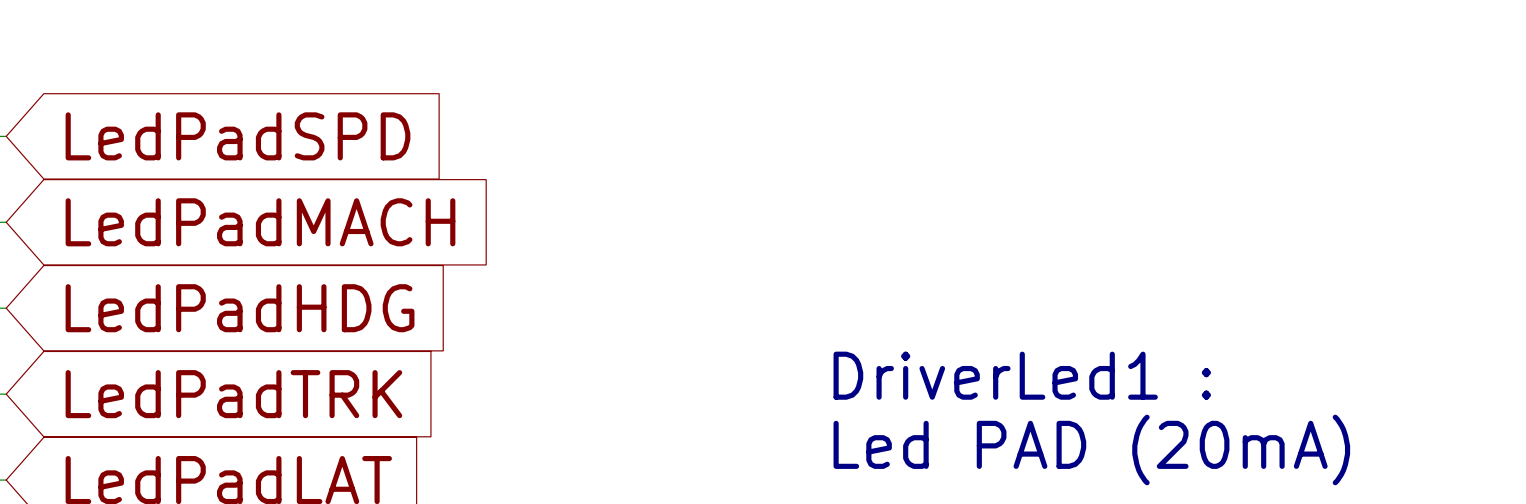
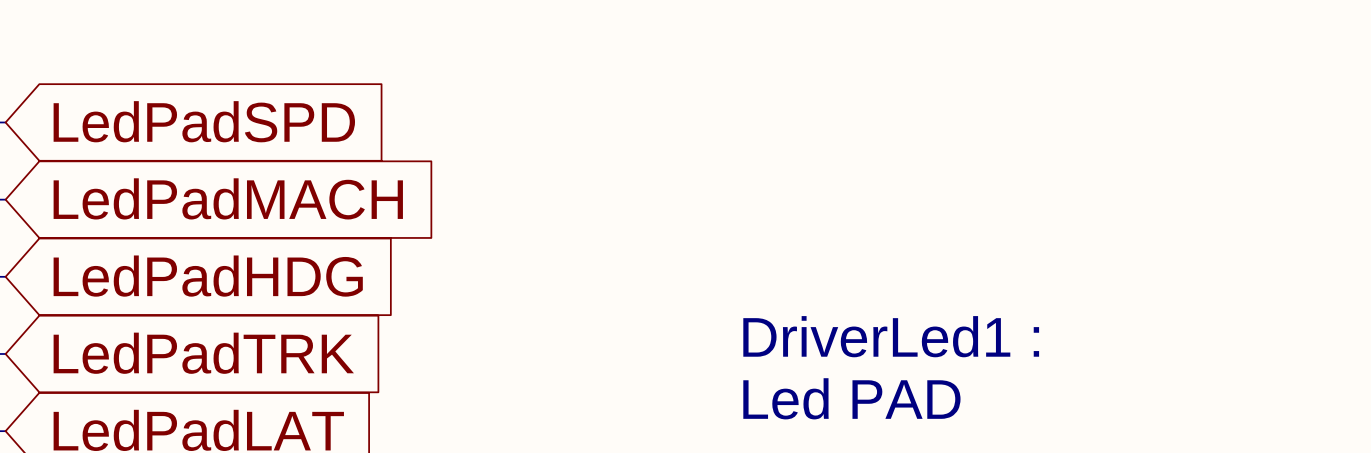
text: Led PAD (20mA) (1091, 449) -> Led PAD (851, 398)

